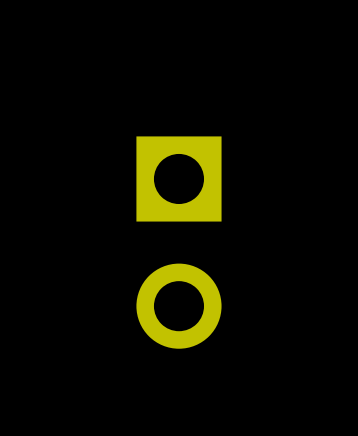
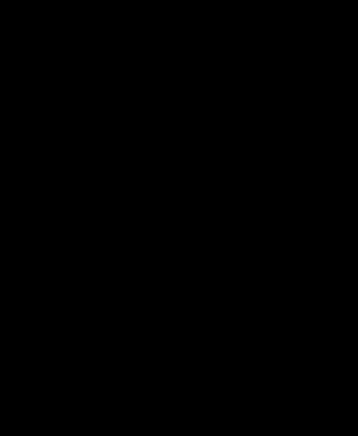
part: (178, 242) -> none

